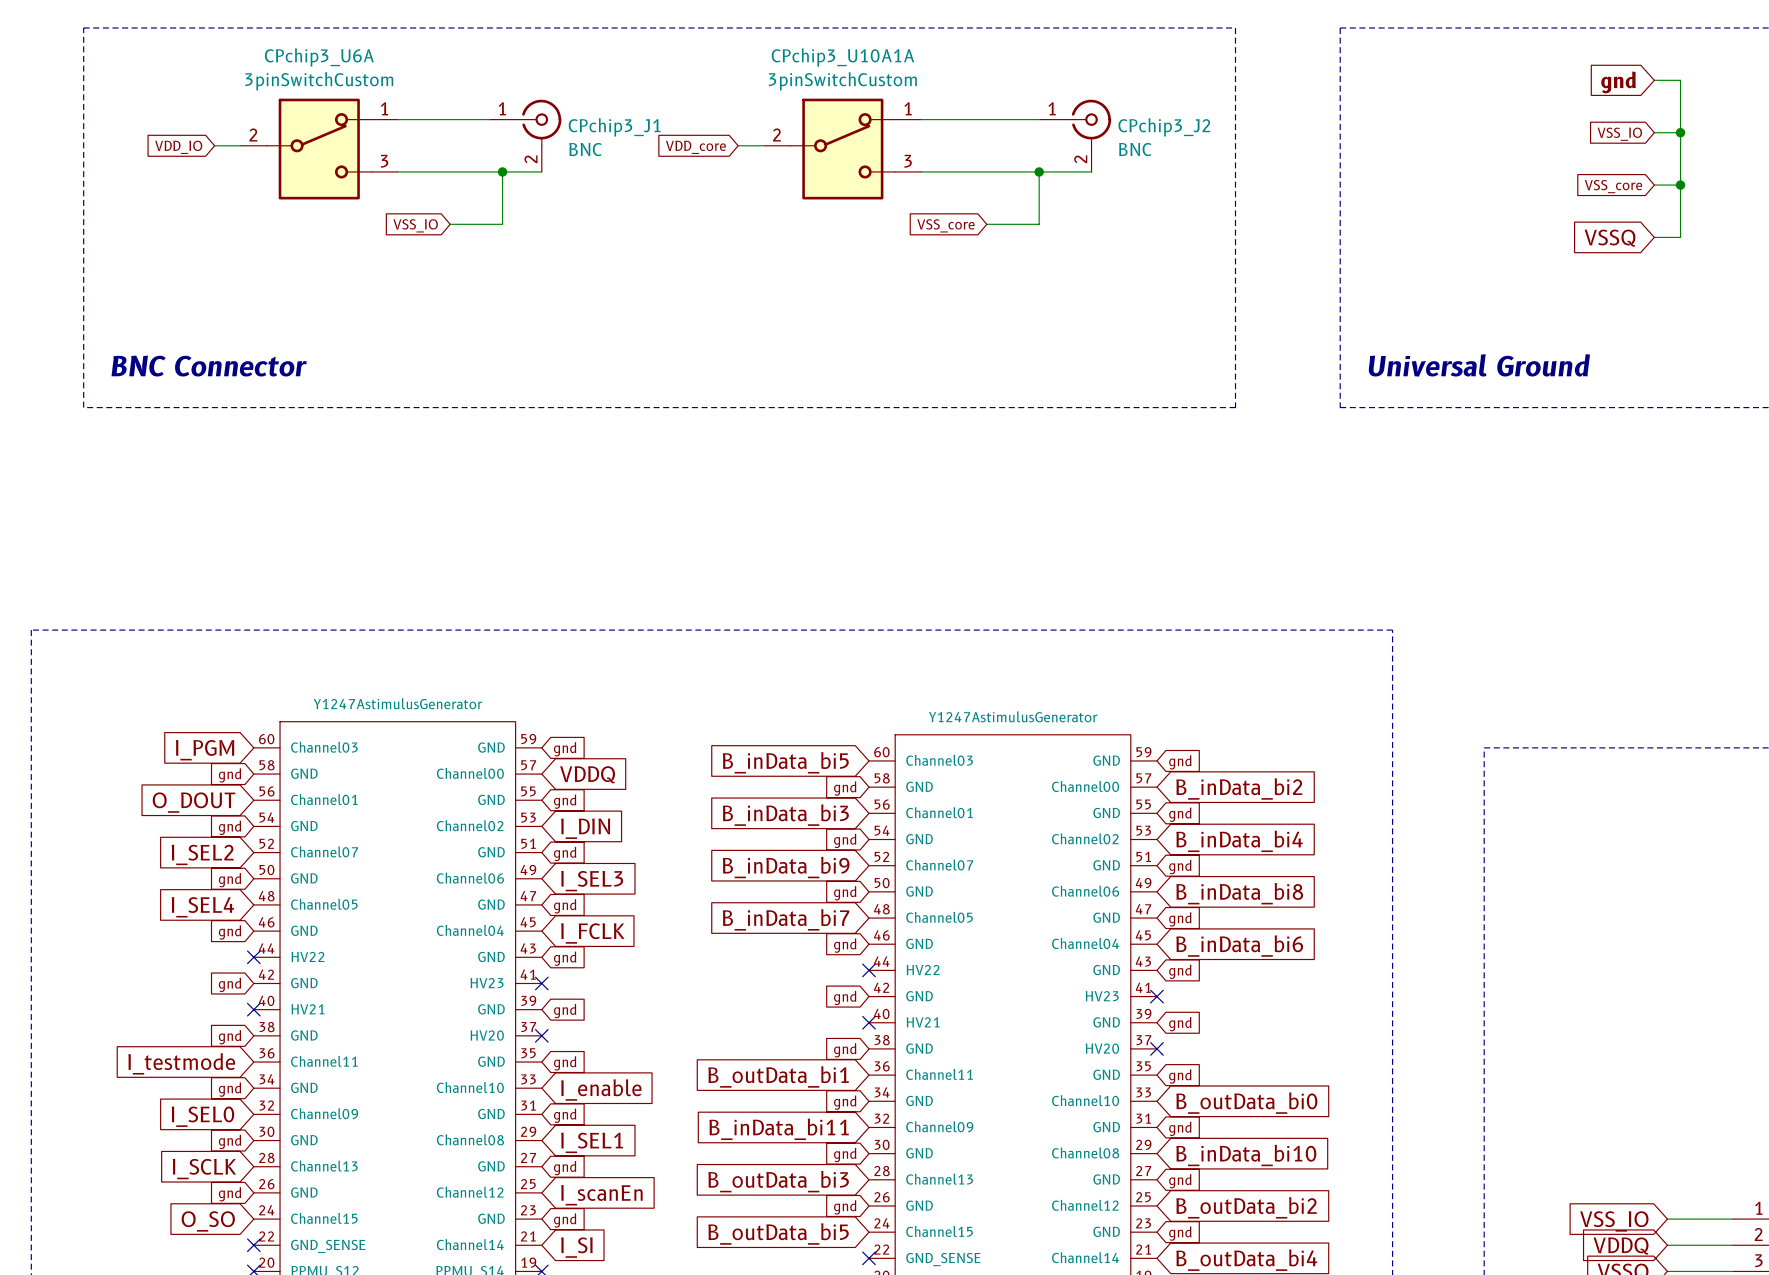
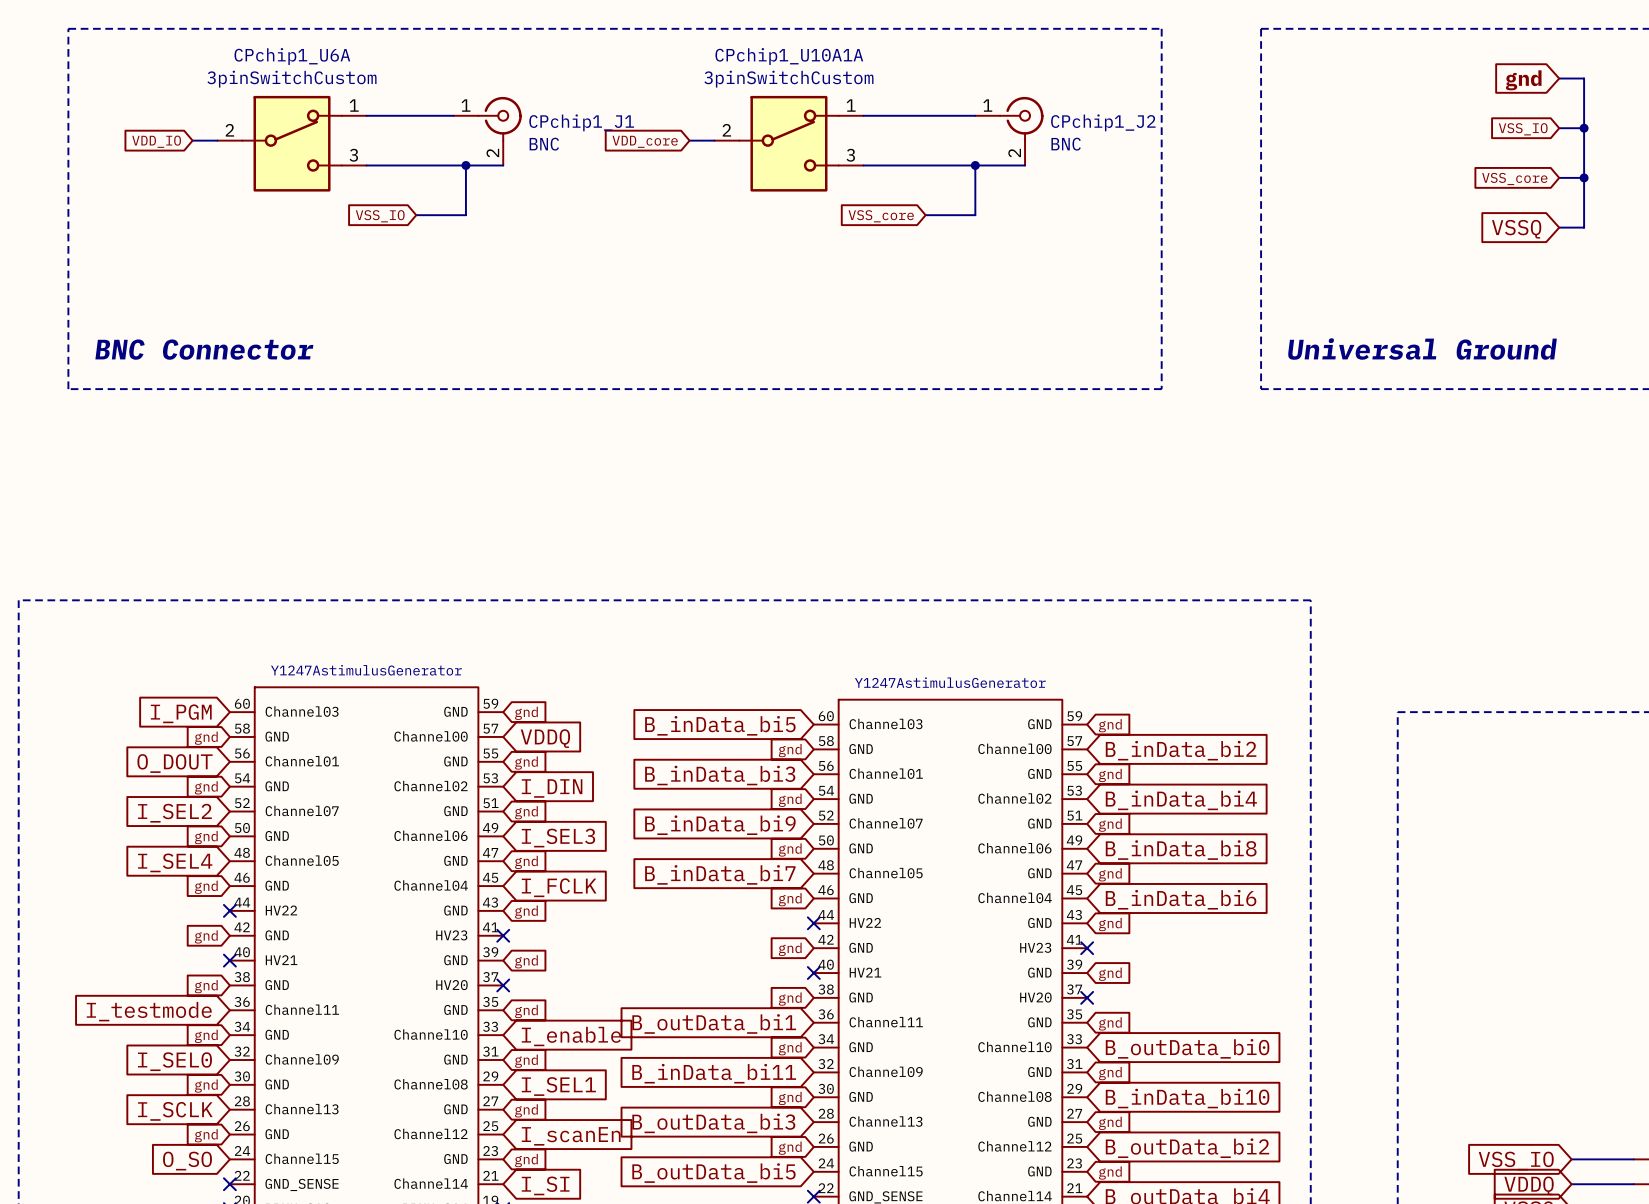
CPchip3_U6A name: CPchip3_U6A (319, 57) -> CPchip1_U6A (292, 56)
CPchip3_U10A1A name: CPchip3_U10A1A (842, 57) -> CPchip1_U10A1A (789, 56)
CPchip3_J1 name: CPchip3_J1 (614, 127) -> CPchip1_J1 (581, 122)
CPchip3_J2 name: CPchip3_J2 (1164, 127) -> CPchip1_J2 (1103, 122)

